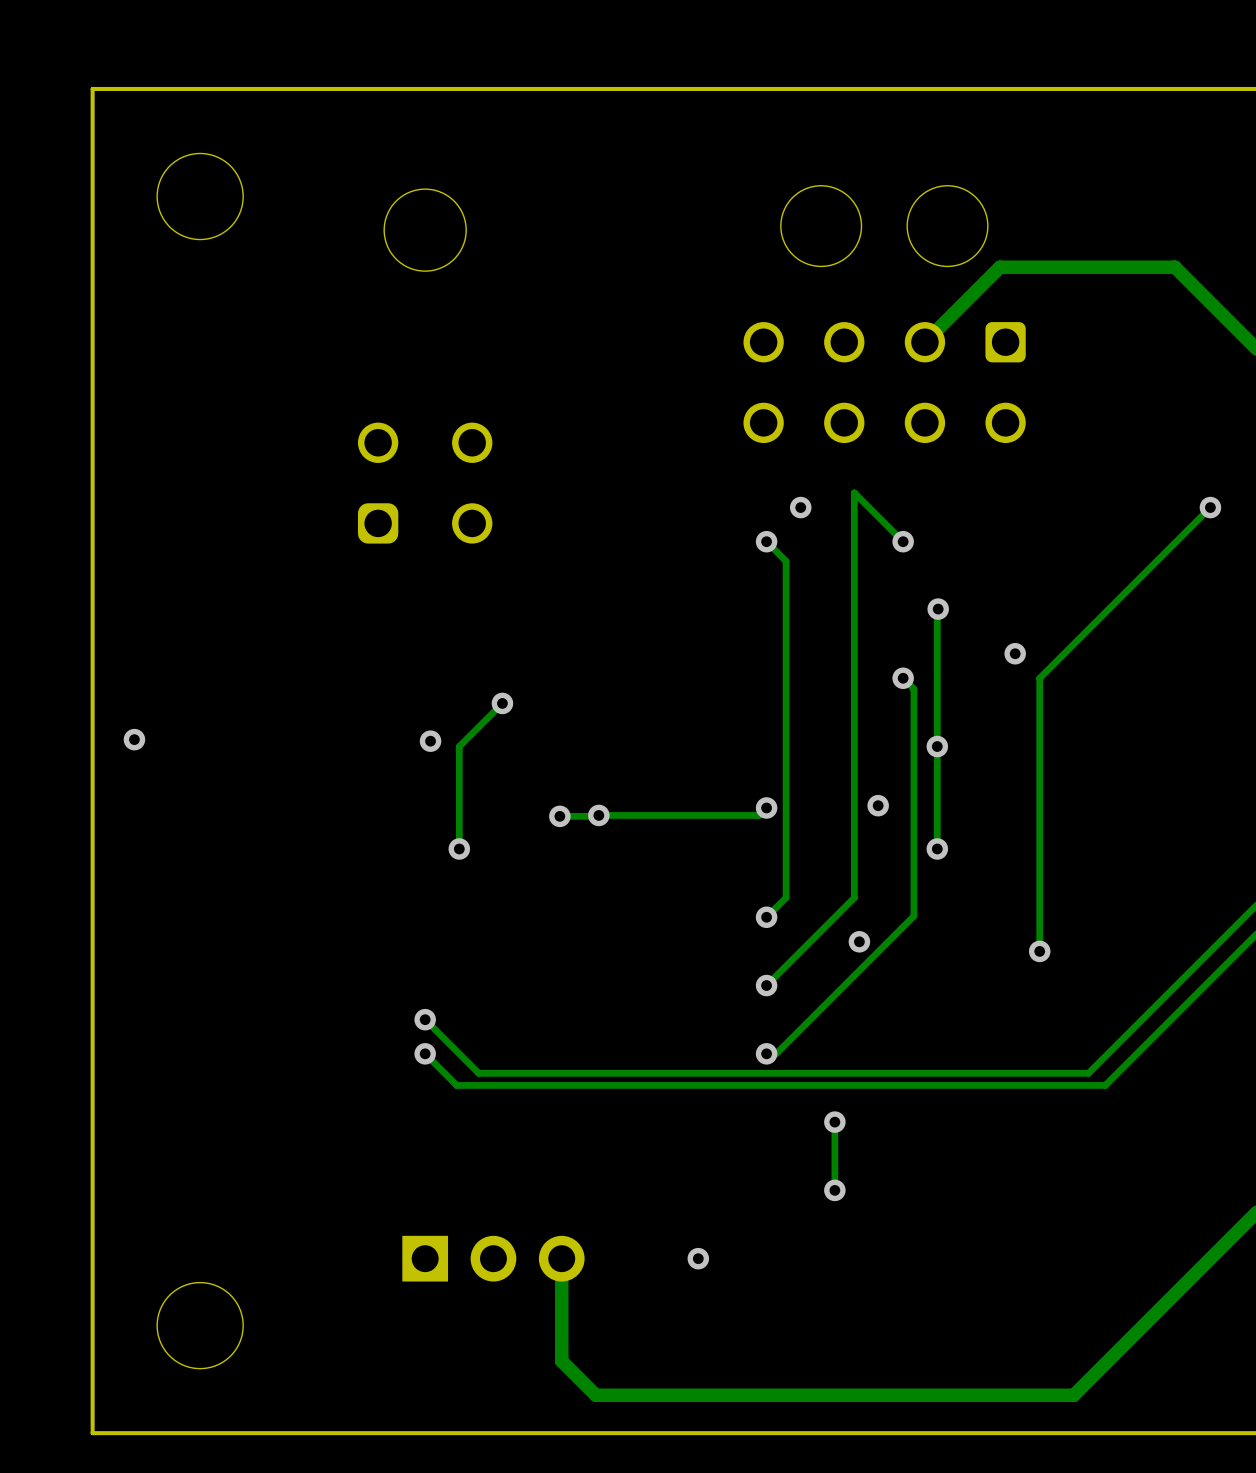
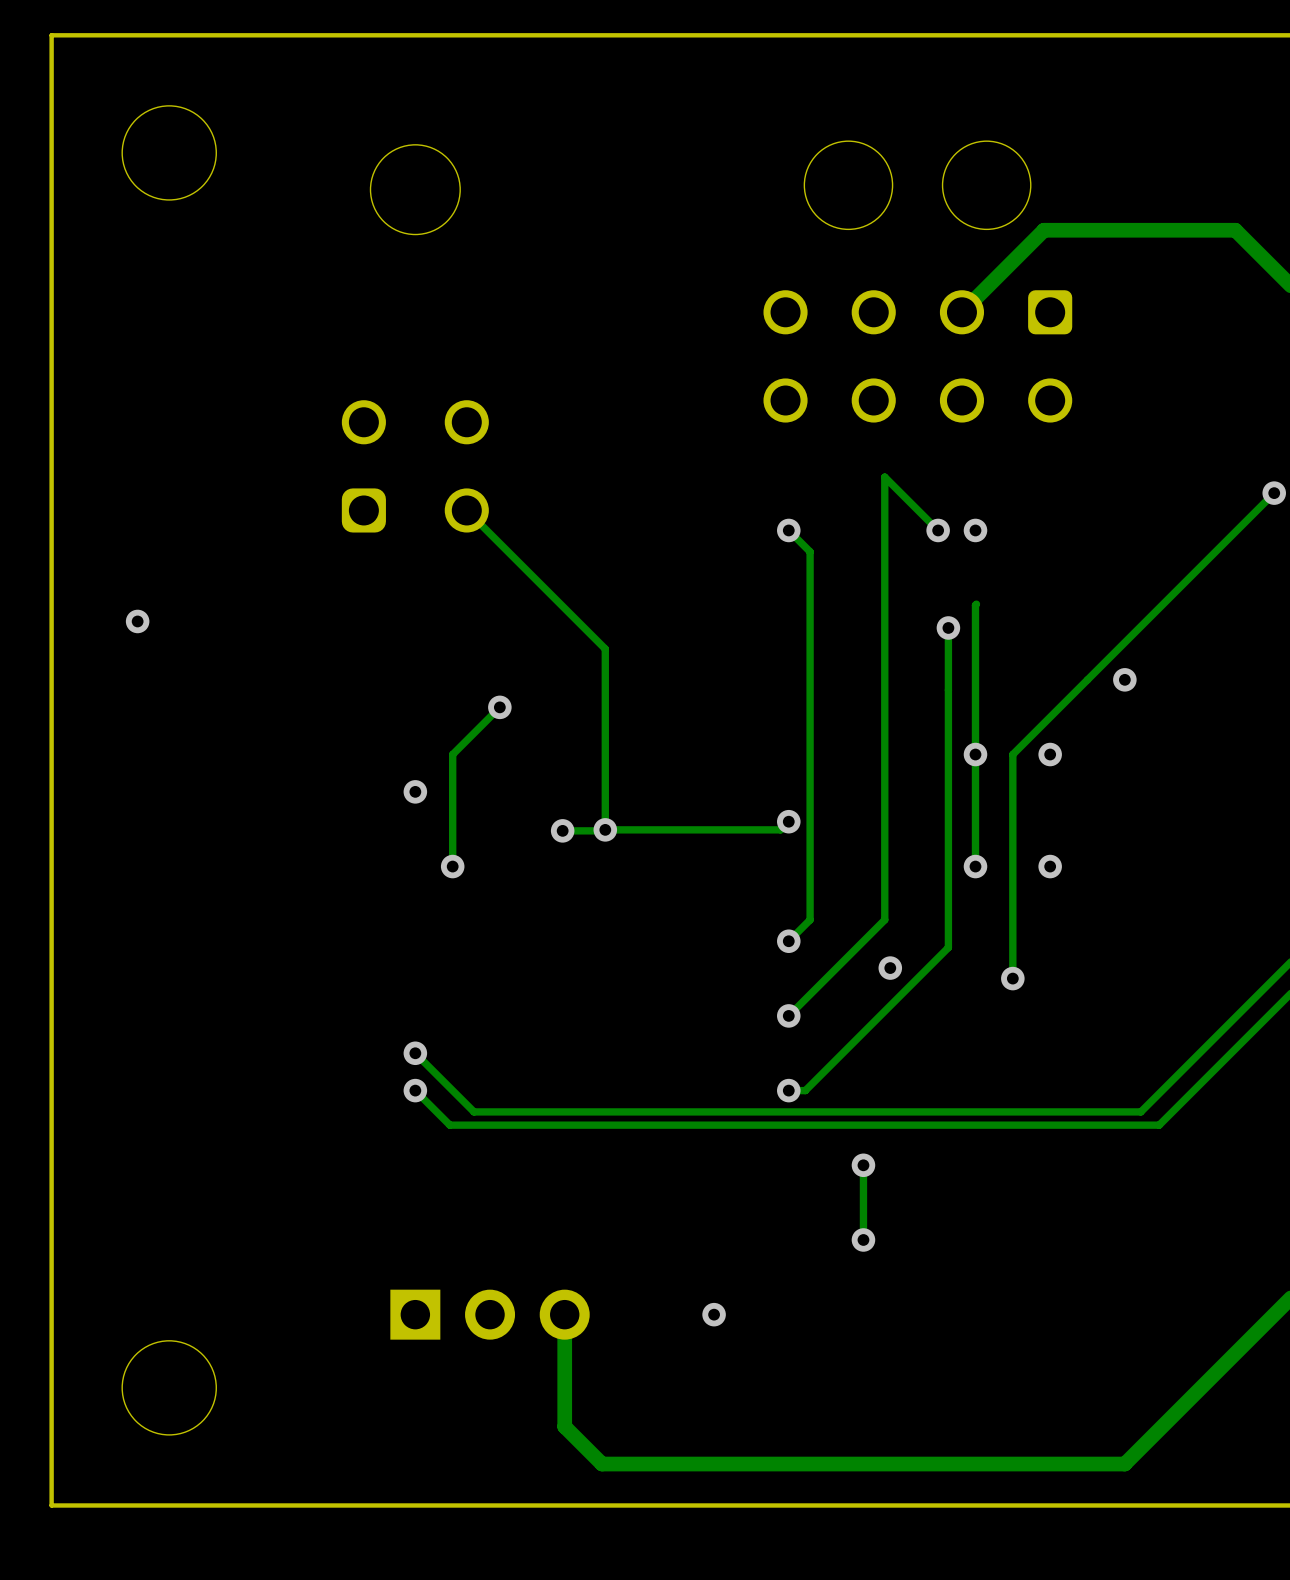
via: (800, 507) -> none
track: none -> (466, 510) (605, 648) (605, 829)
via: none -> (975, 530)
via: (938, 609) -> none
via: none -> (948, 627)
via: (1015, 653) -> none
track: (903, 678) (913, 689) (913, 916) (776, 1053) -> (948, 627) (948, 947) (805, 1090) (799, 1090)
via: (903, 678) -> none
track: (1039, 678) (1039, 951) -> (1087, 679) (1012, 754) (1012, 978)
via: none -> (1124, 679)
via position: (134, 739) -> (137, 621)
via position: (430, 741) -> (415, 791)
via: none -> (1050, 754)
via: (878, 805) -> none
via: none -> (1050, 866)
via: none -> (1012, 978)
via: (1039, 951) -> none

